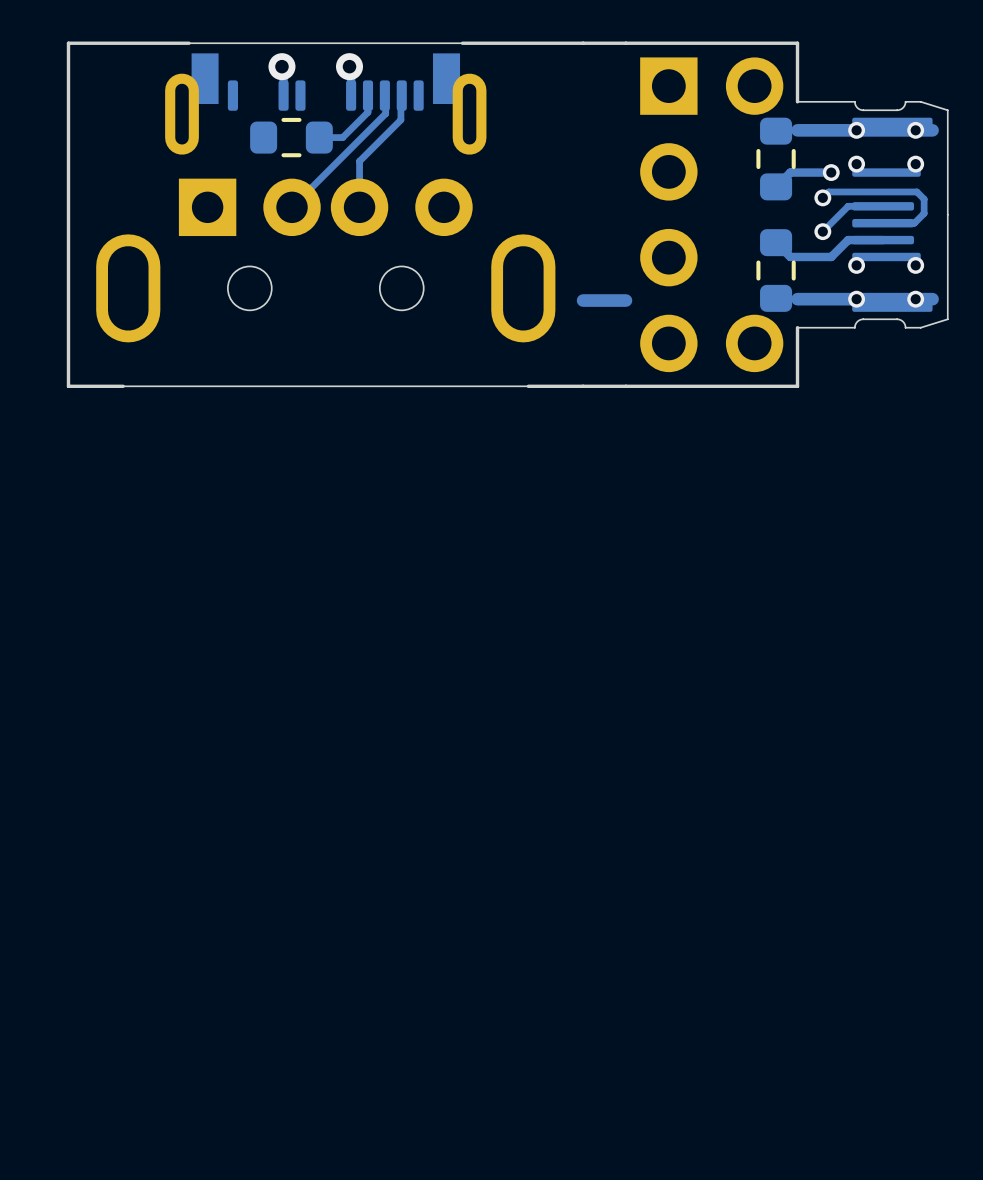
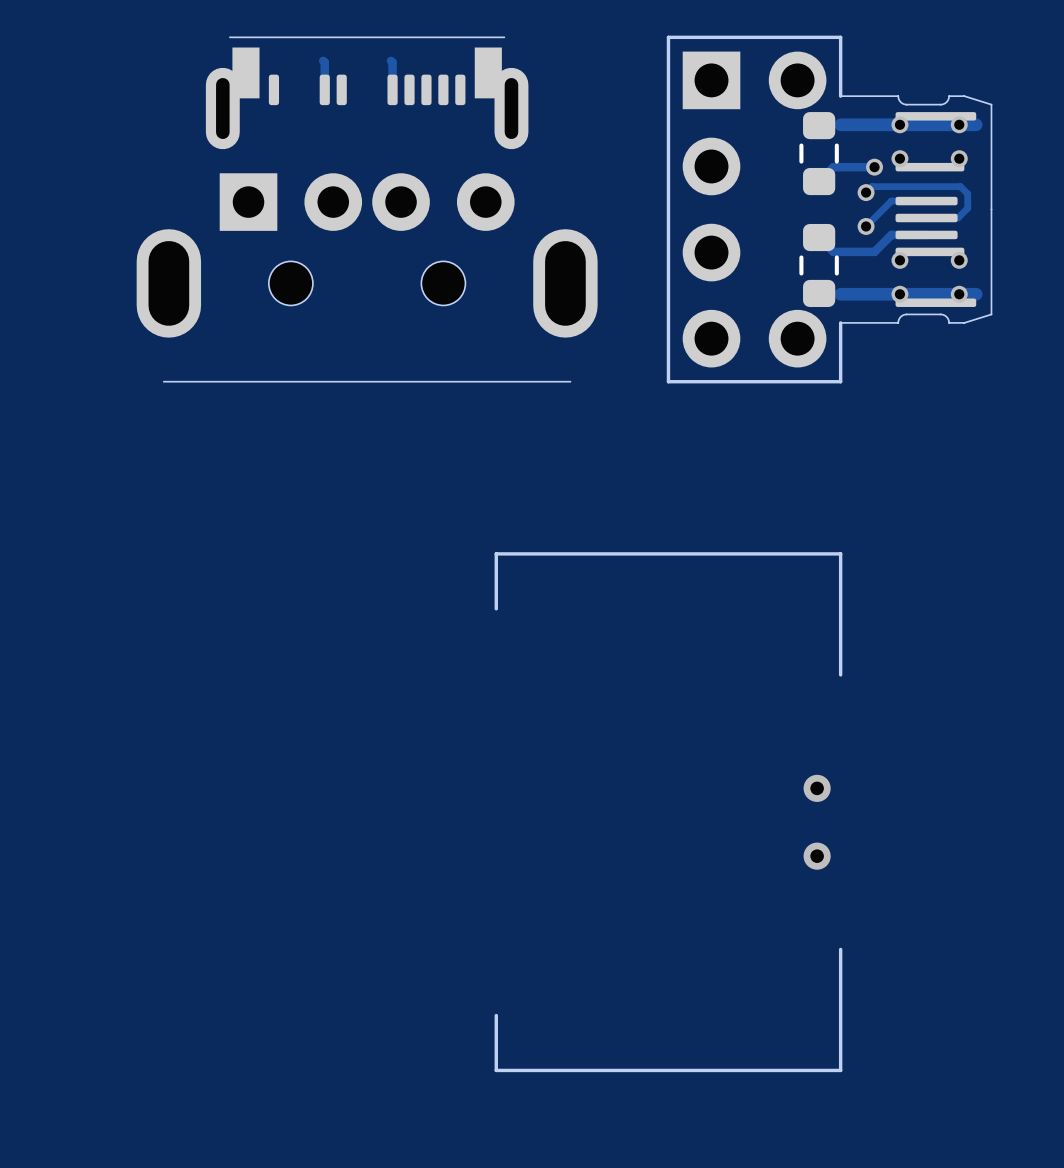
board edge: (189, 43) (68, 43) (68, 386) (123, 386) -> none
board edge: (625, 43) (462, 43) -> none
via: (281, 66) -> none
via: (349, 66) -> none
track: (368, 95) (368, 112) (342, 137) (319, 137) (341, 137) -> none
track: (384, 95) (385, 113) (292, 207) -> none
track: (401, 95) (400, 119) (359, 161) (359, 207) -> none
part: (291, 137) -> none
track: (625, 300) (583, 300) -> none
board edge: (625, 386) (528, 386) -> (668, 381) (668, 37)
board edge: none -> (496, 608) (496, 553) (840, 553) (840, 674)
via: none -> (817, 788)
via: none -> (817, 856)
board edge: none -> (840, 949) (840, 1070) (496, 1070) (496, 1015)

